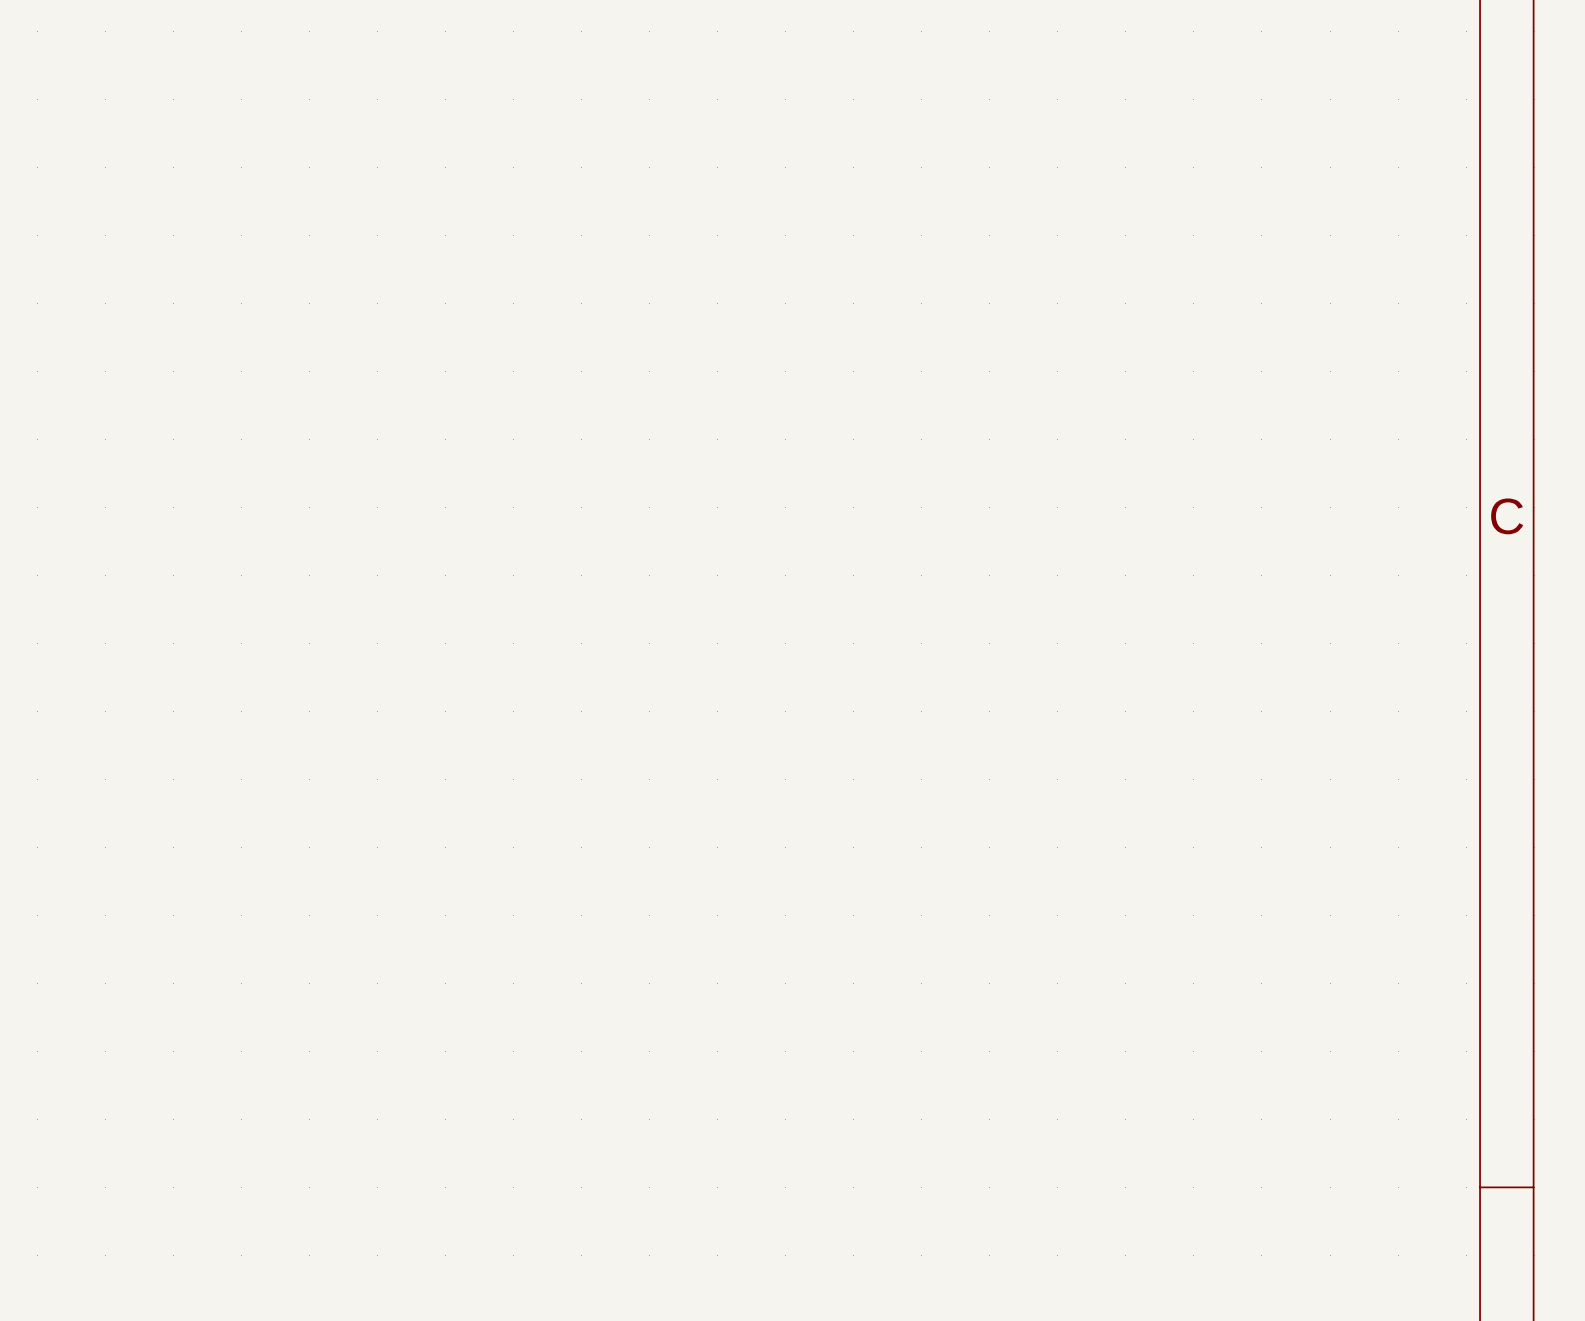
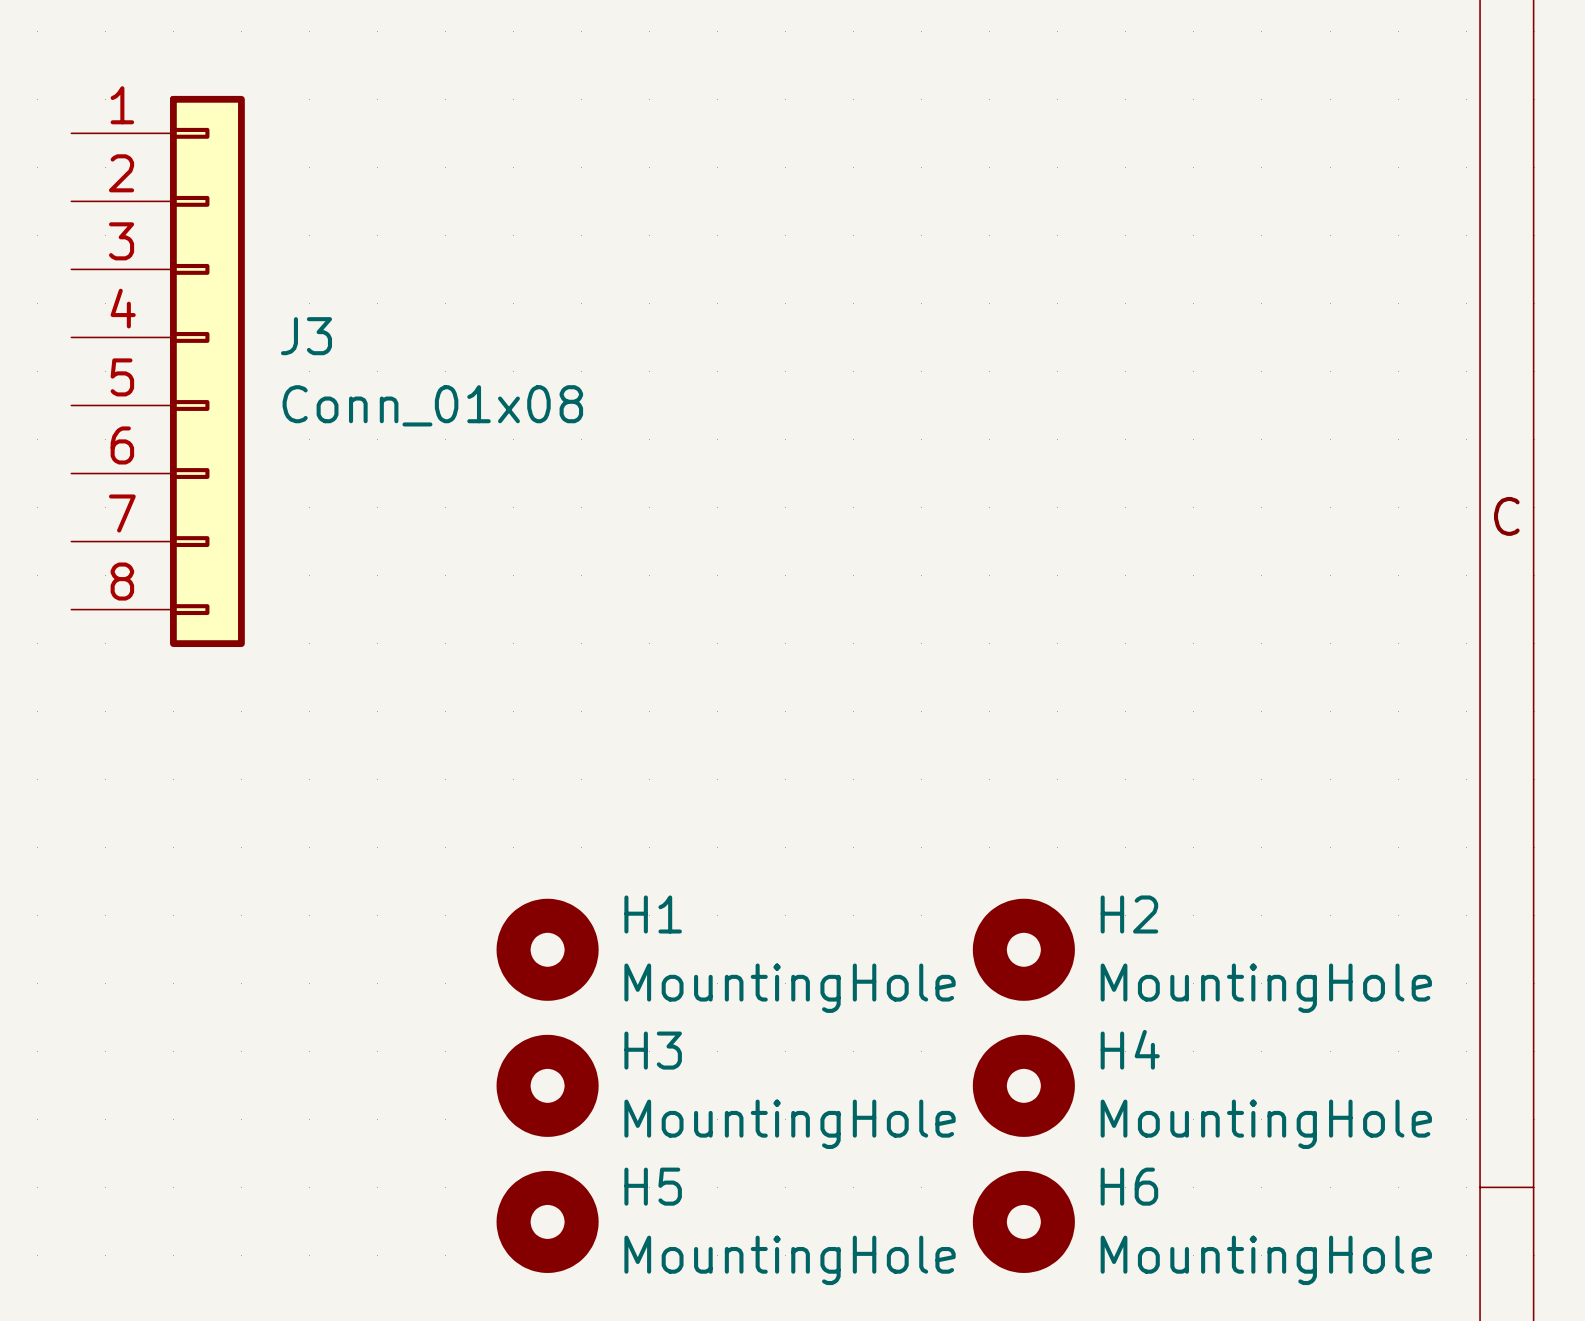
J3: none -> Conn_01x08 (158, 371)
H1: none -> MountingHole (547, 949)
H2: none -> MountingHole (1023, 949)
H3: none -> MountingHole (547, 1085)
H4: none -> MountingHole (1023, 1085)
H5: none -> MountingHole (547, 1221)
H6: none -> MountingHole (1023, 1221)

